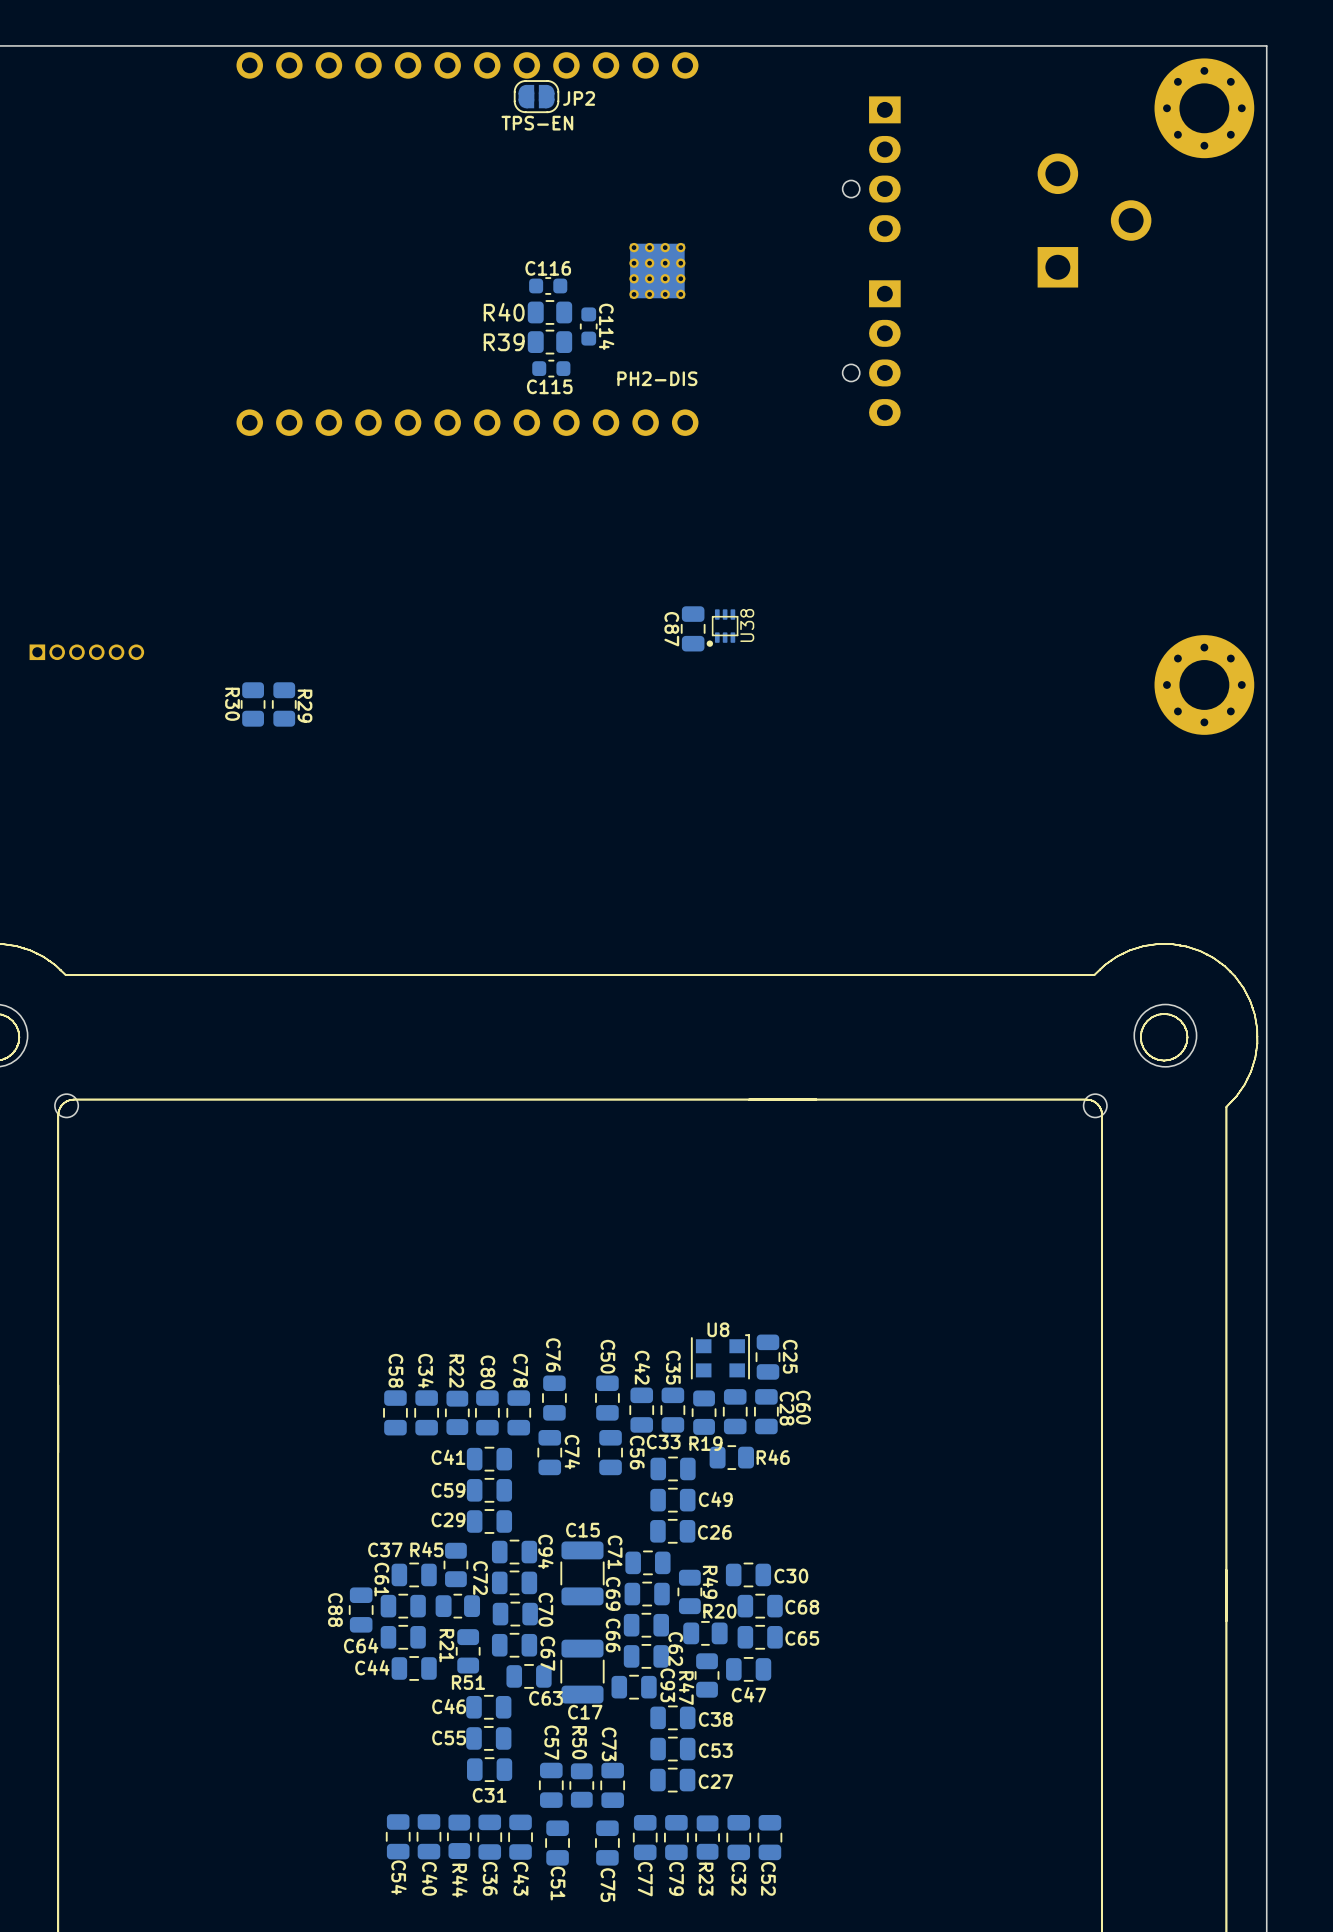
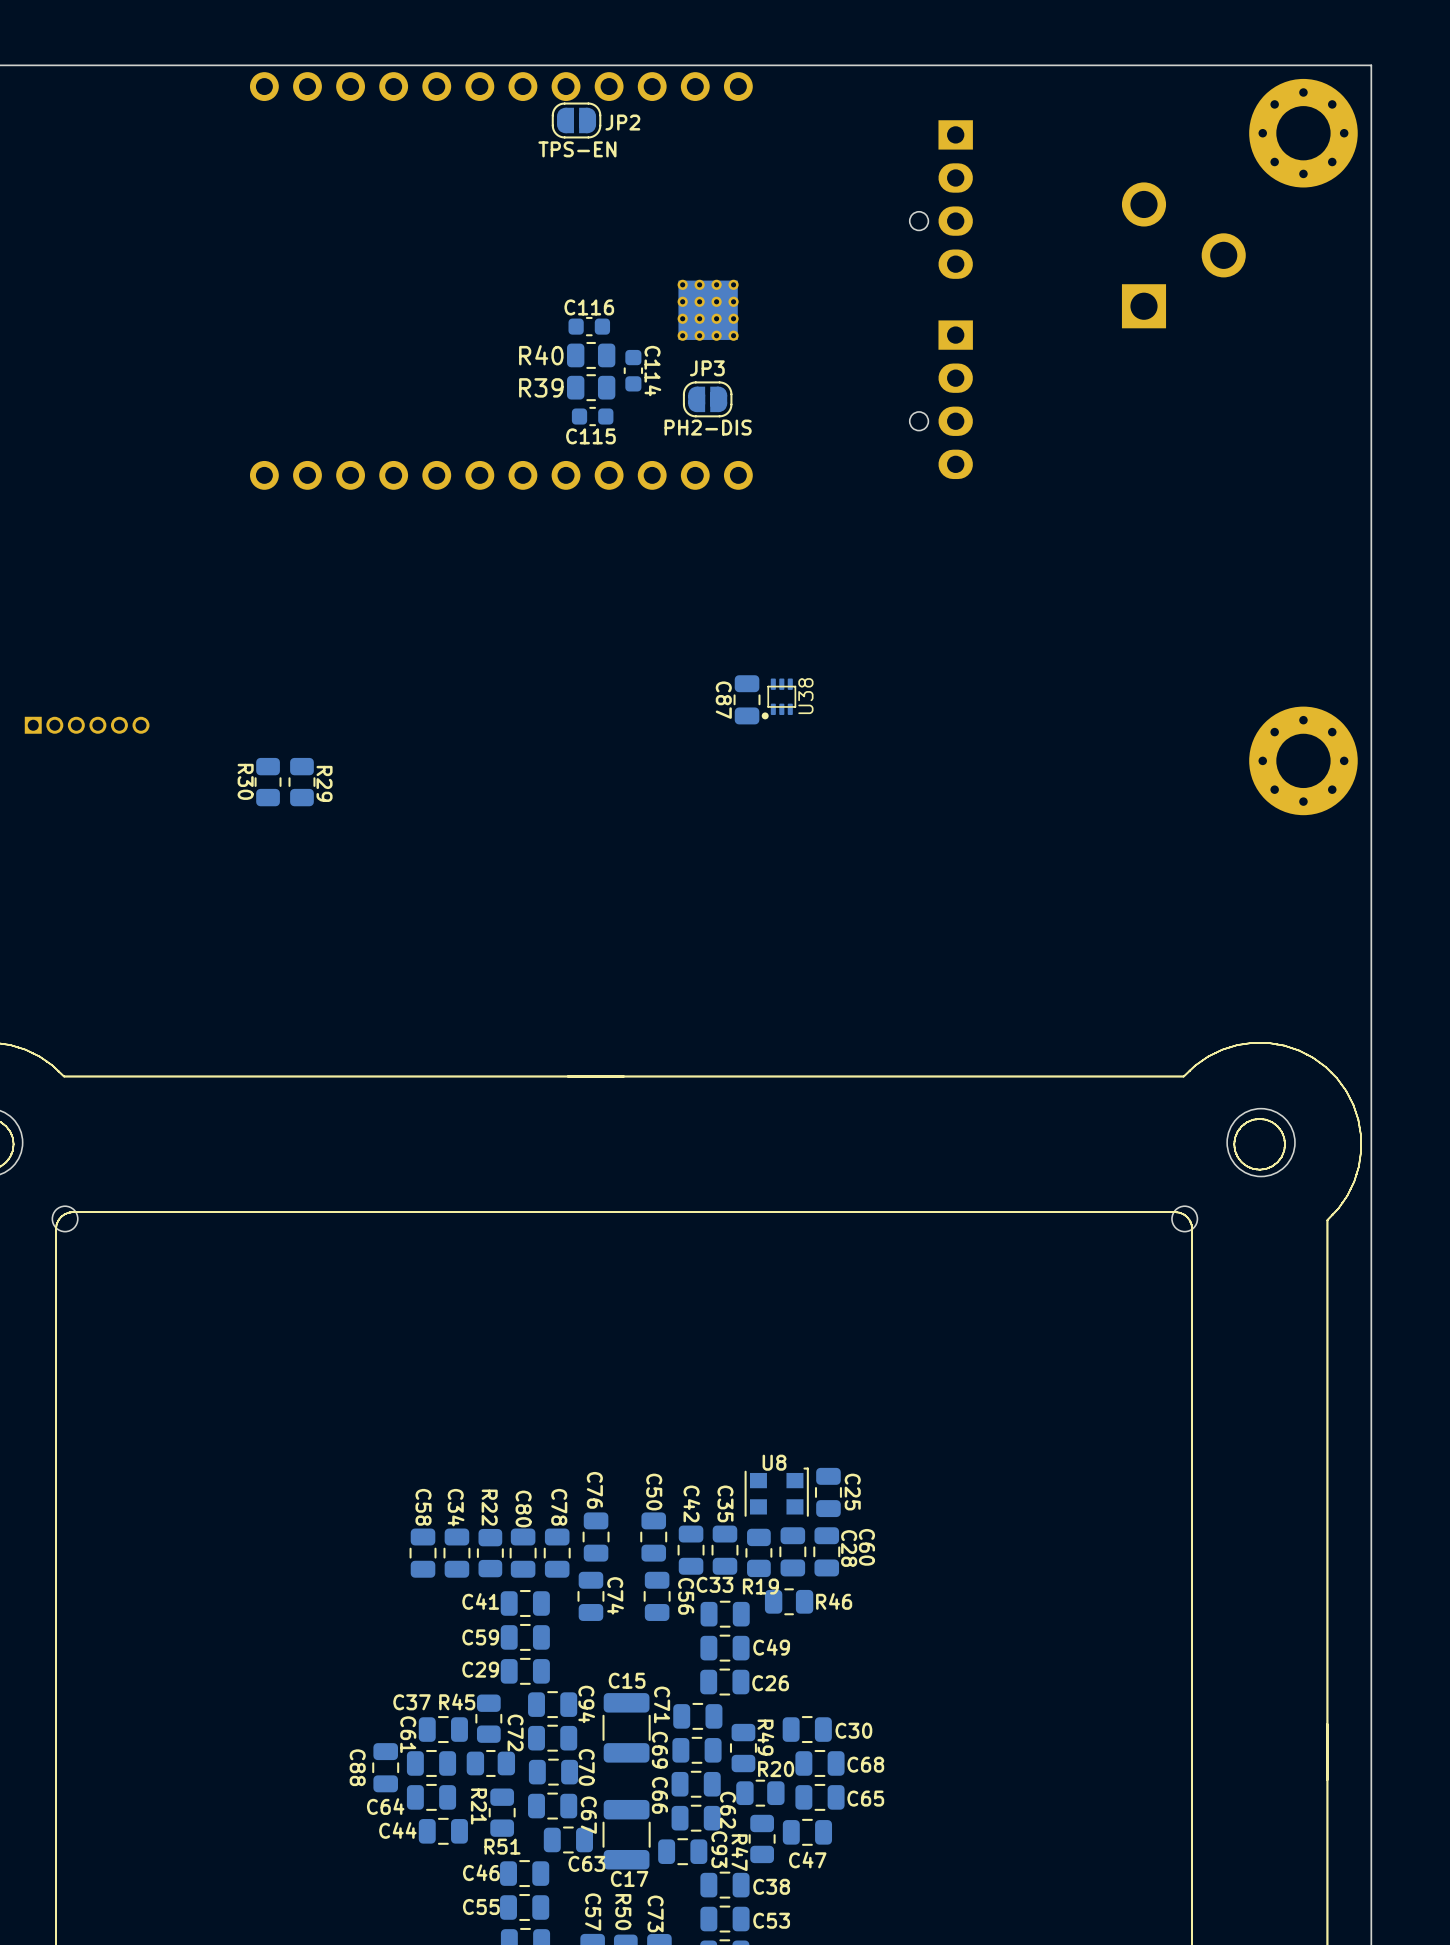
JP3: none -> (707, 399)

